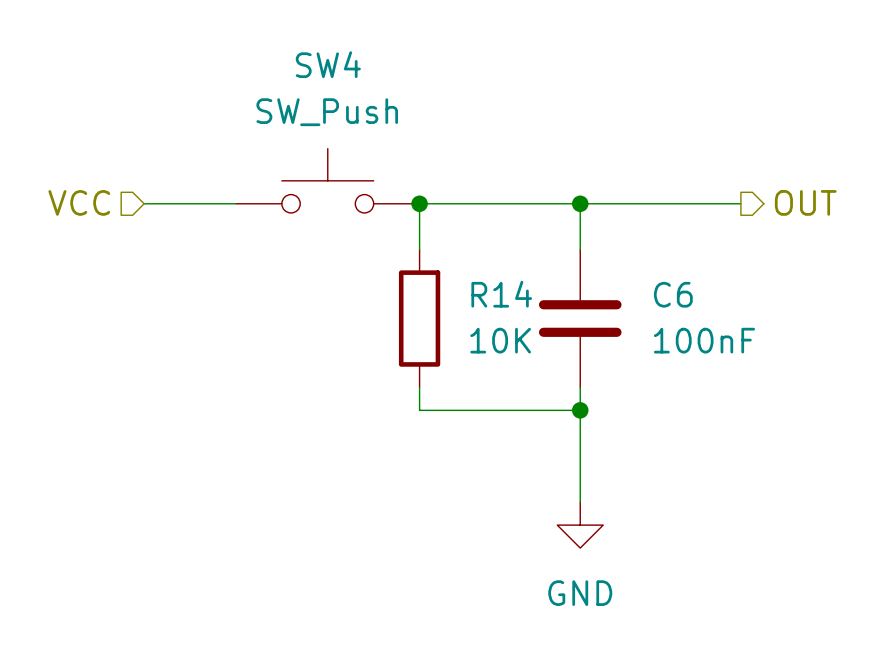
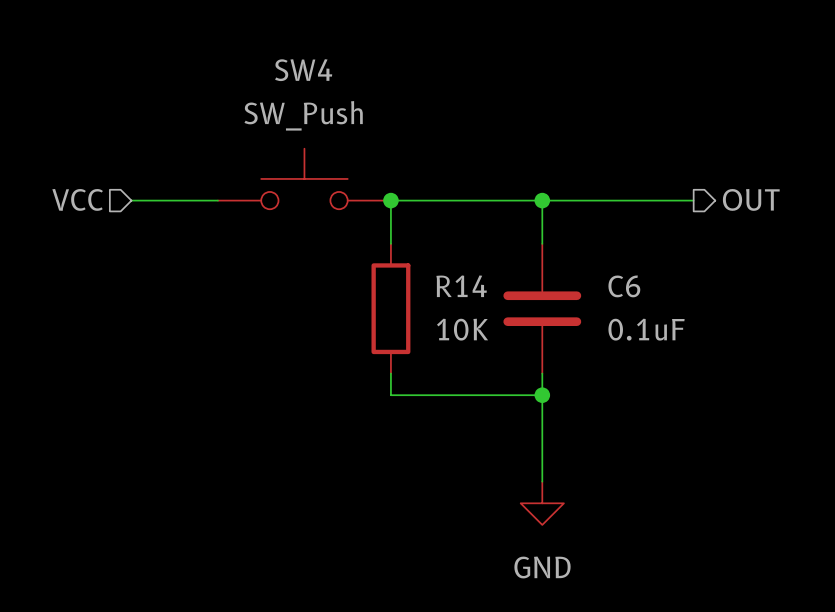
C6 value: 100nF (704, 340) -> 0.1uF (646, 329)

